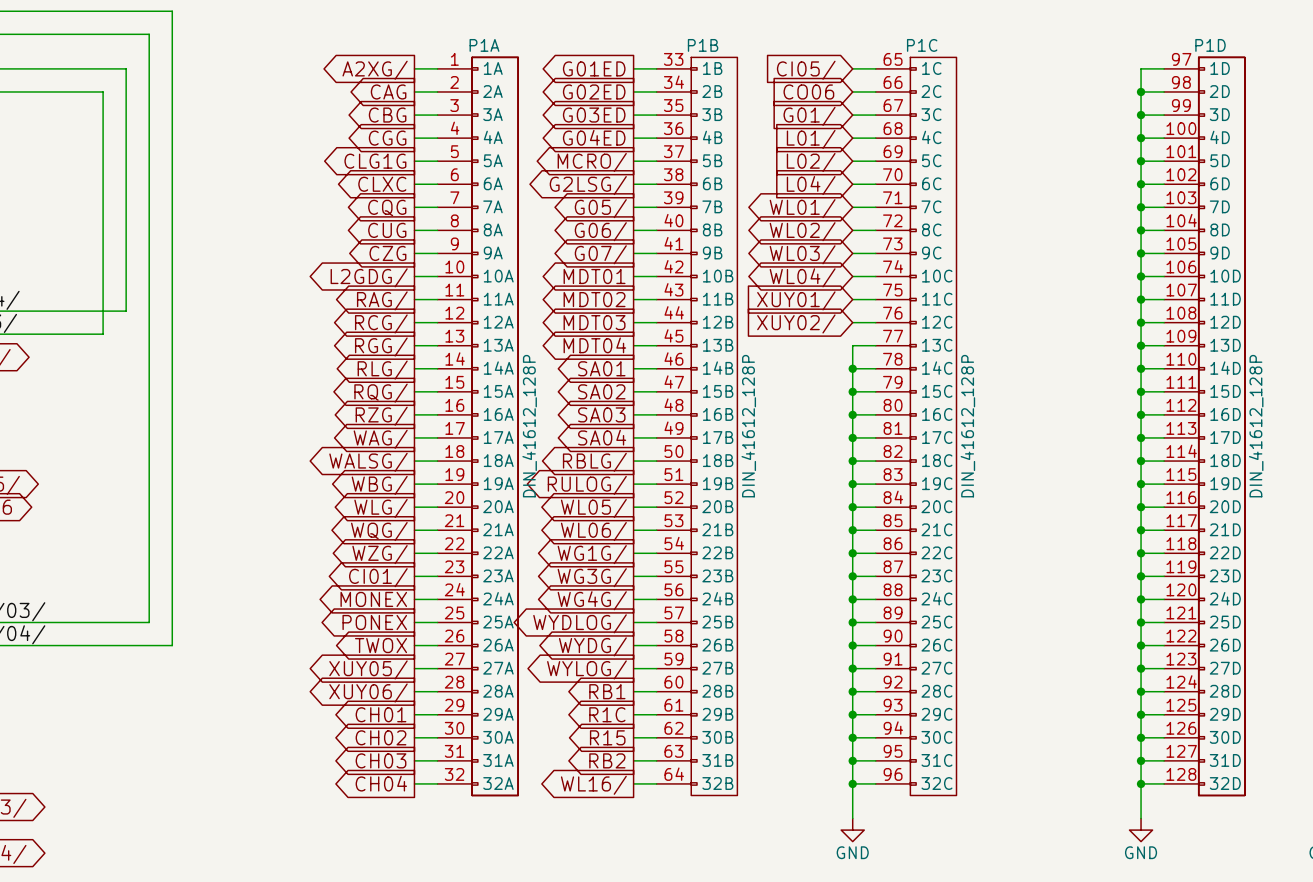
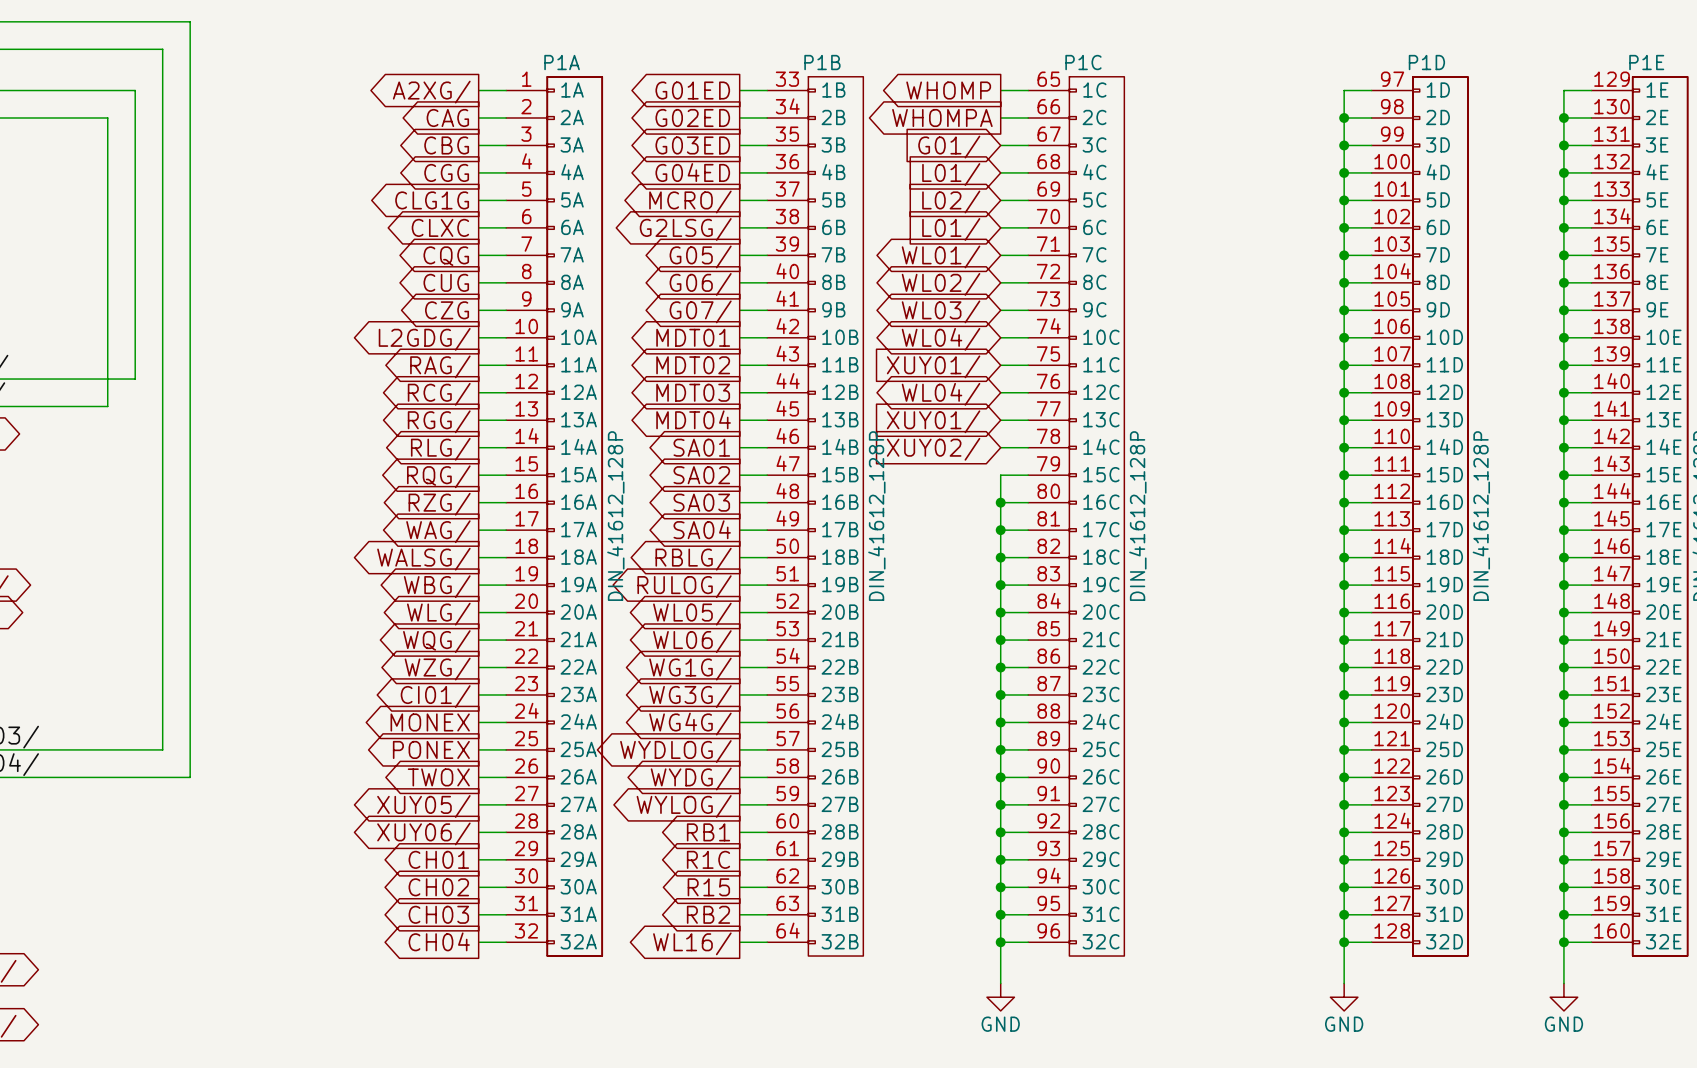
global label shape: input (806, 70) -> output (948, 90)
global label: CI05/ (806, 70) -> WHOMP (948, 90)
global label shape: input (808, 91) -> output (942, 117)
global label: CO06 (808, 91) -> WHOMPA (942, 117)
global label: L04/ (811, 185) -> L01/ (951, 229)
global label shape: input (796, 323) -> bidirectional (941, 394)
global label: XUY02/ (796, 323) -> WL04/ (941, 394)
wire: (852, 345) (852, 391) -> none
global label: none -> XUY01/ (933, 421)
junction: (852, 368) -> none
global label: none -> XUY02/ (933, 449)
junction: (852, 391) -> none

